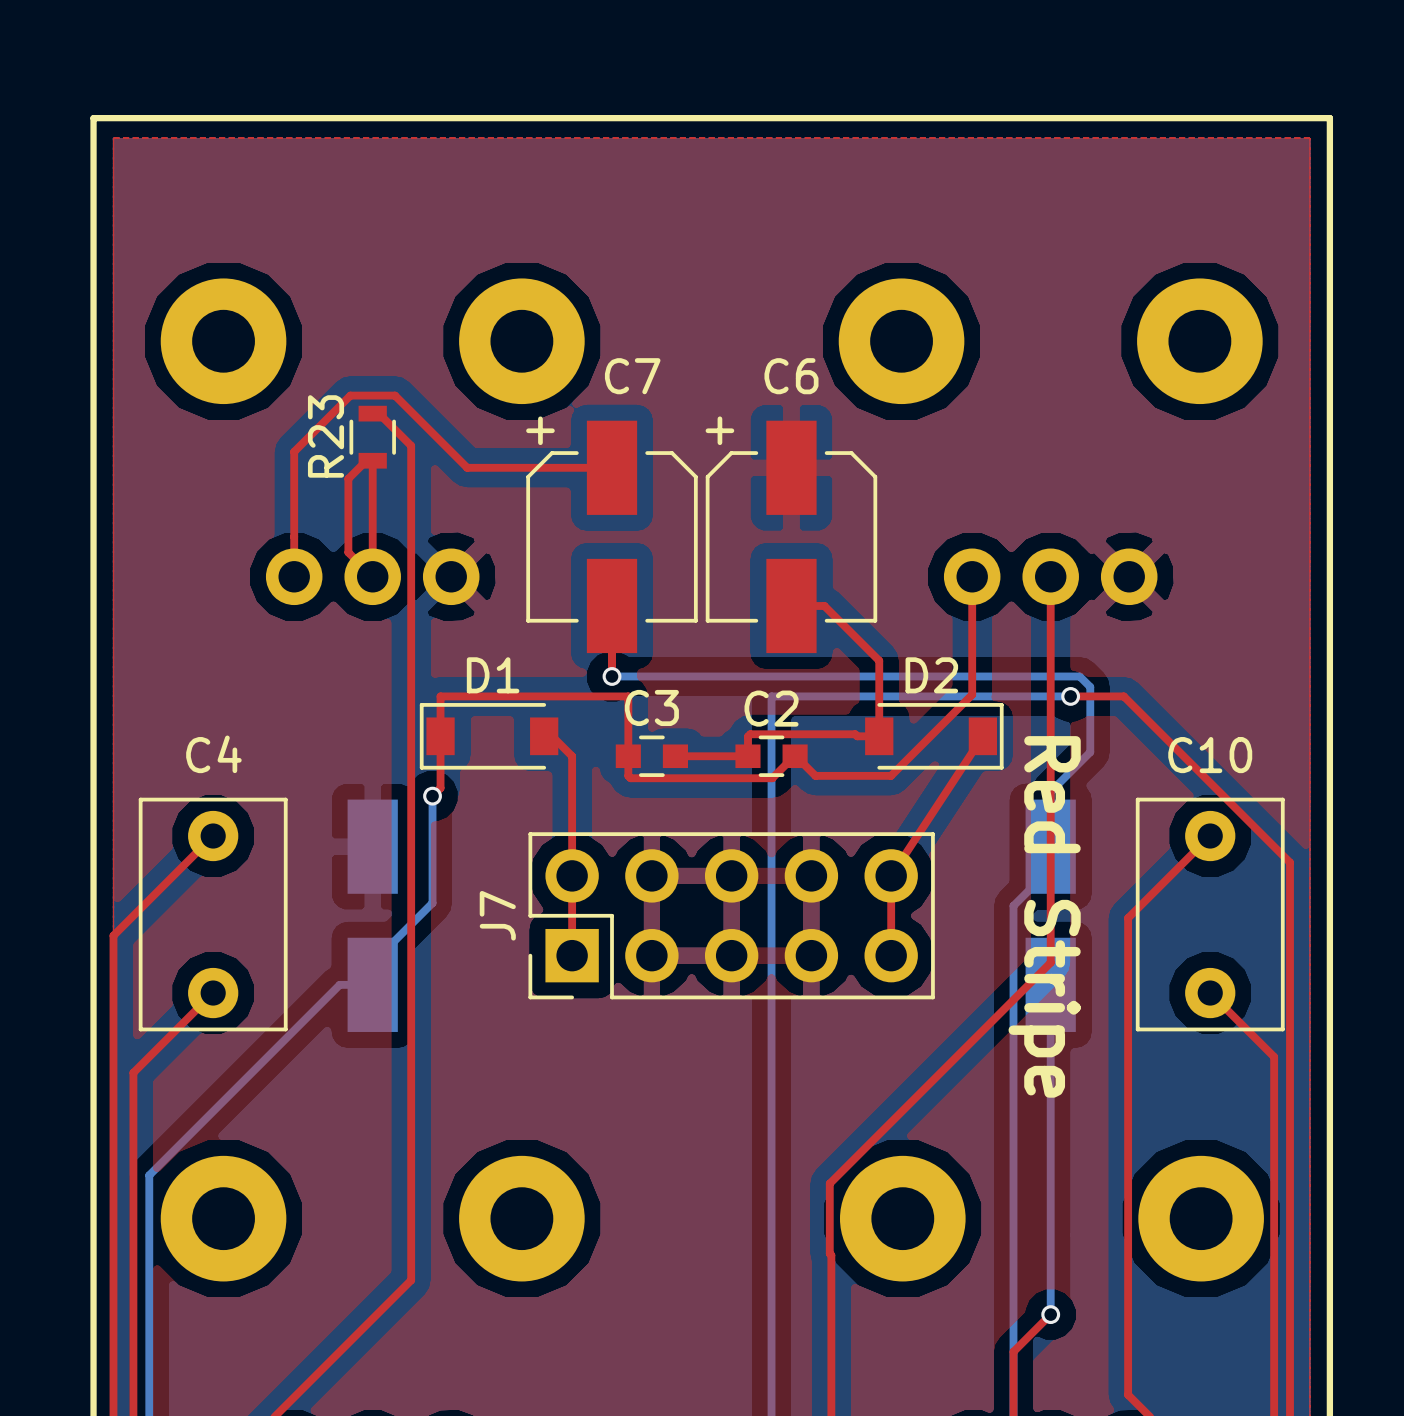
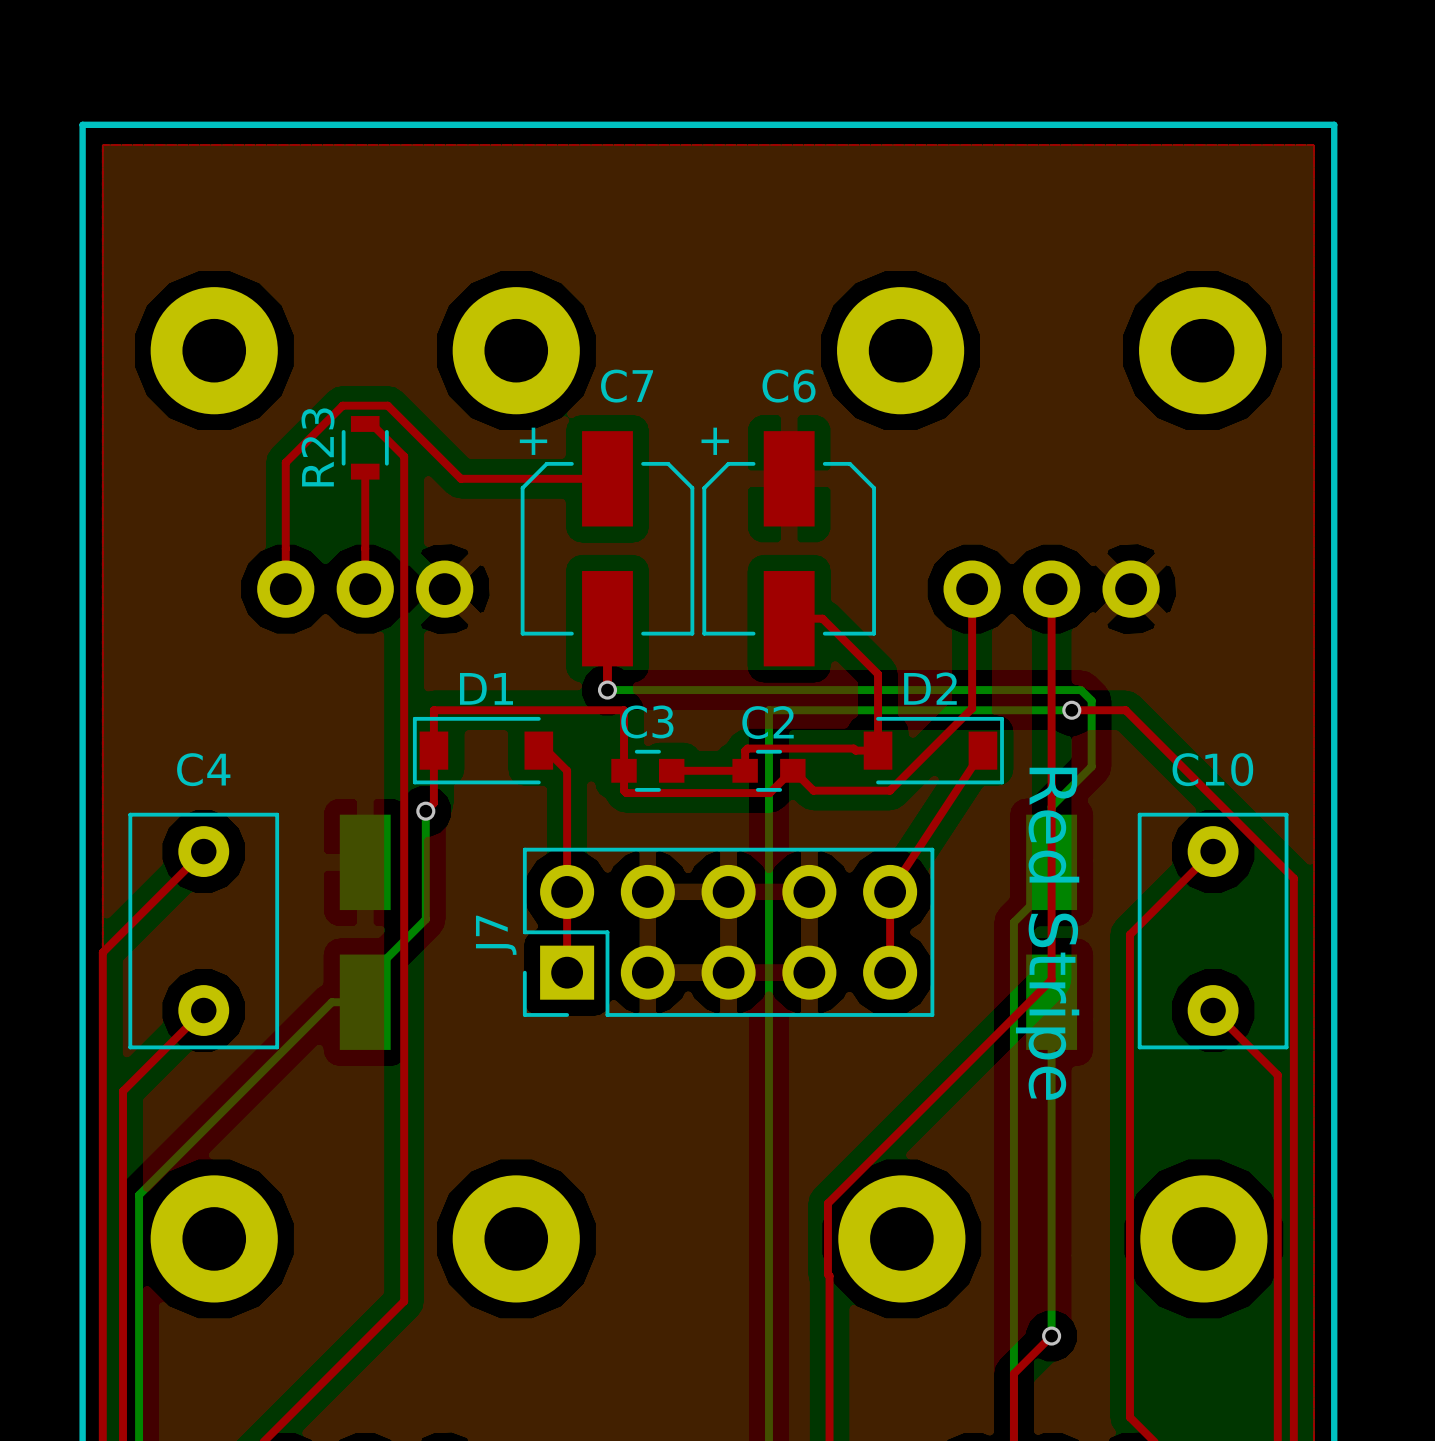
top track: (366, 460) (348, 478) (348, 552) (358, 562) -> none

